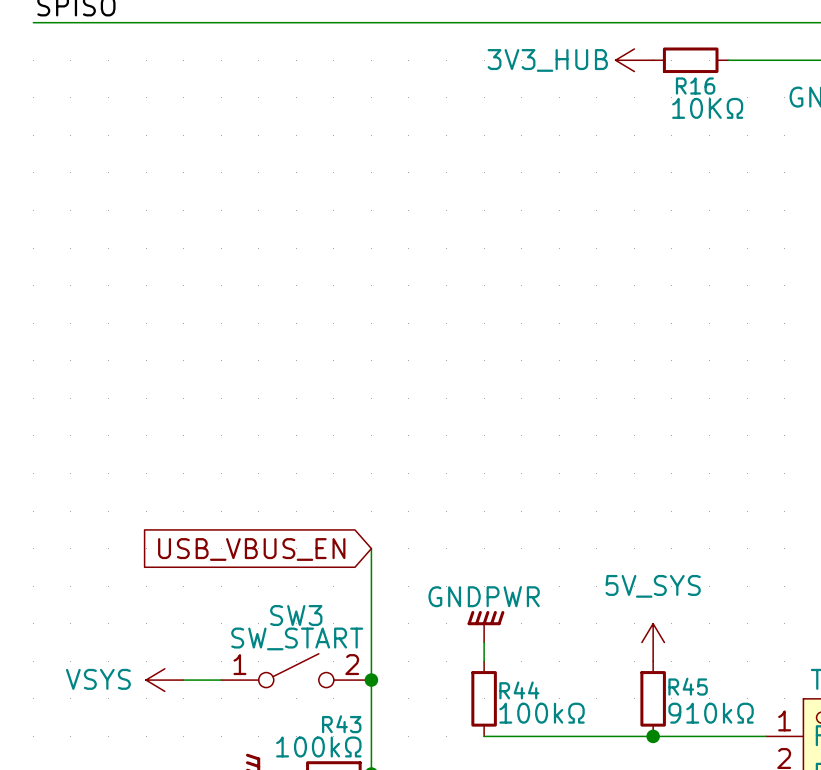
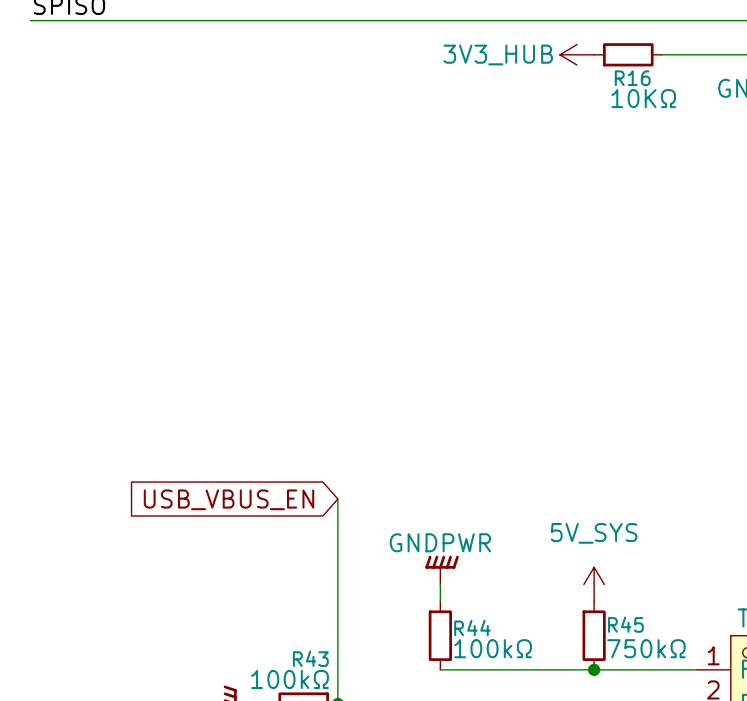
SW3: SW_START (296, 670) -> none
power symbol: VSYS (164, 680) -> none
wire: (183, 680) (221, 680) -> none
junction: (371, 680) -> none
R45 value: 910kΩ (711, 713) -> 750kΩ (646, 648)

